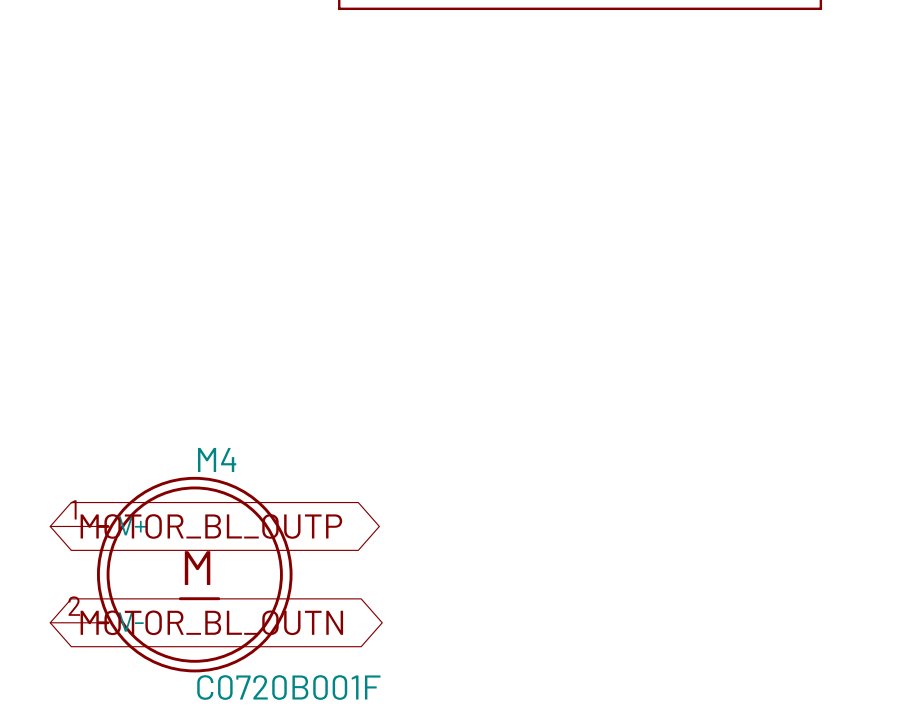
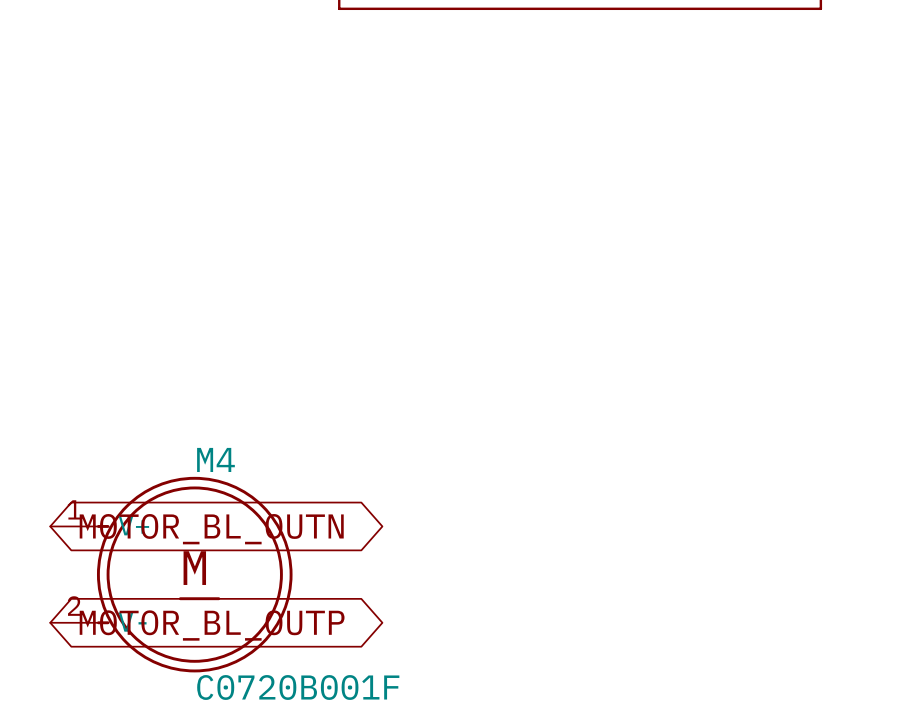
global label: MOTOR_BL_OUTP (211, 526) -> MOTOR_BL_OUTN (211, 529)
global label: MOTOR_BL_OUTN (211, 622) -> MOTOR_BL_OUTP (212, 625)

